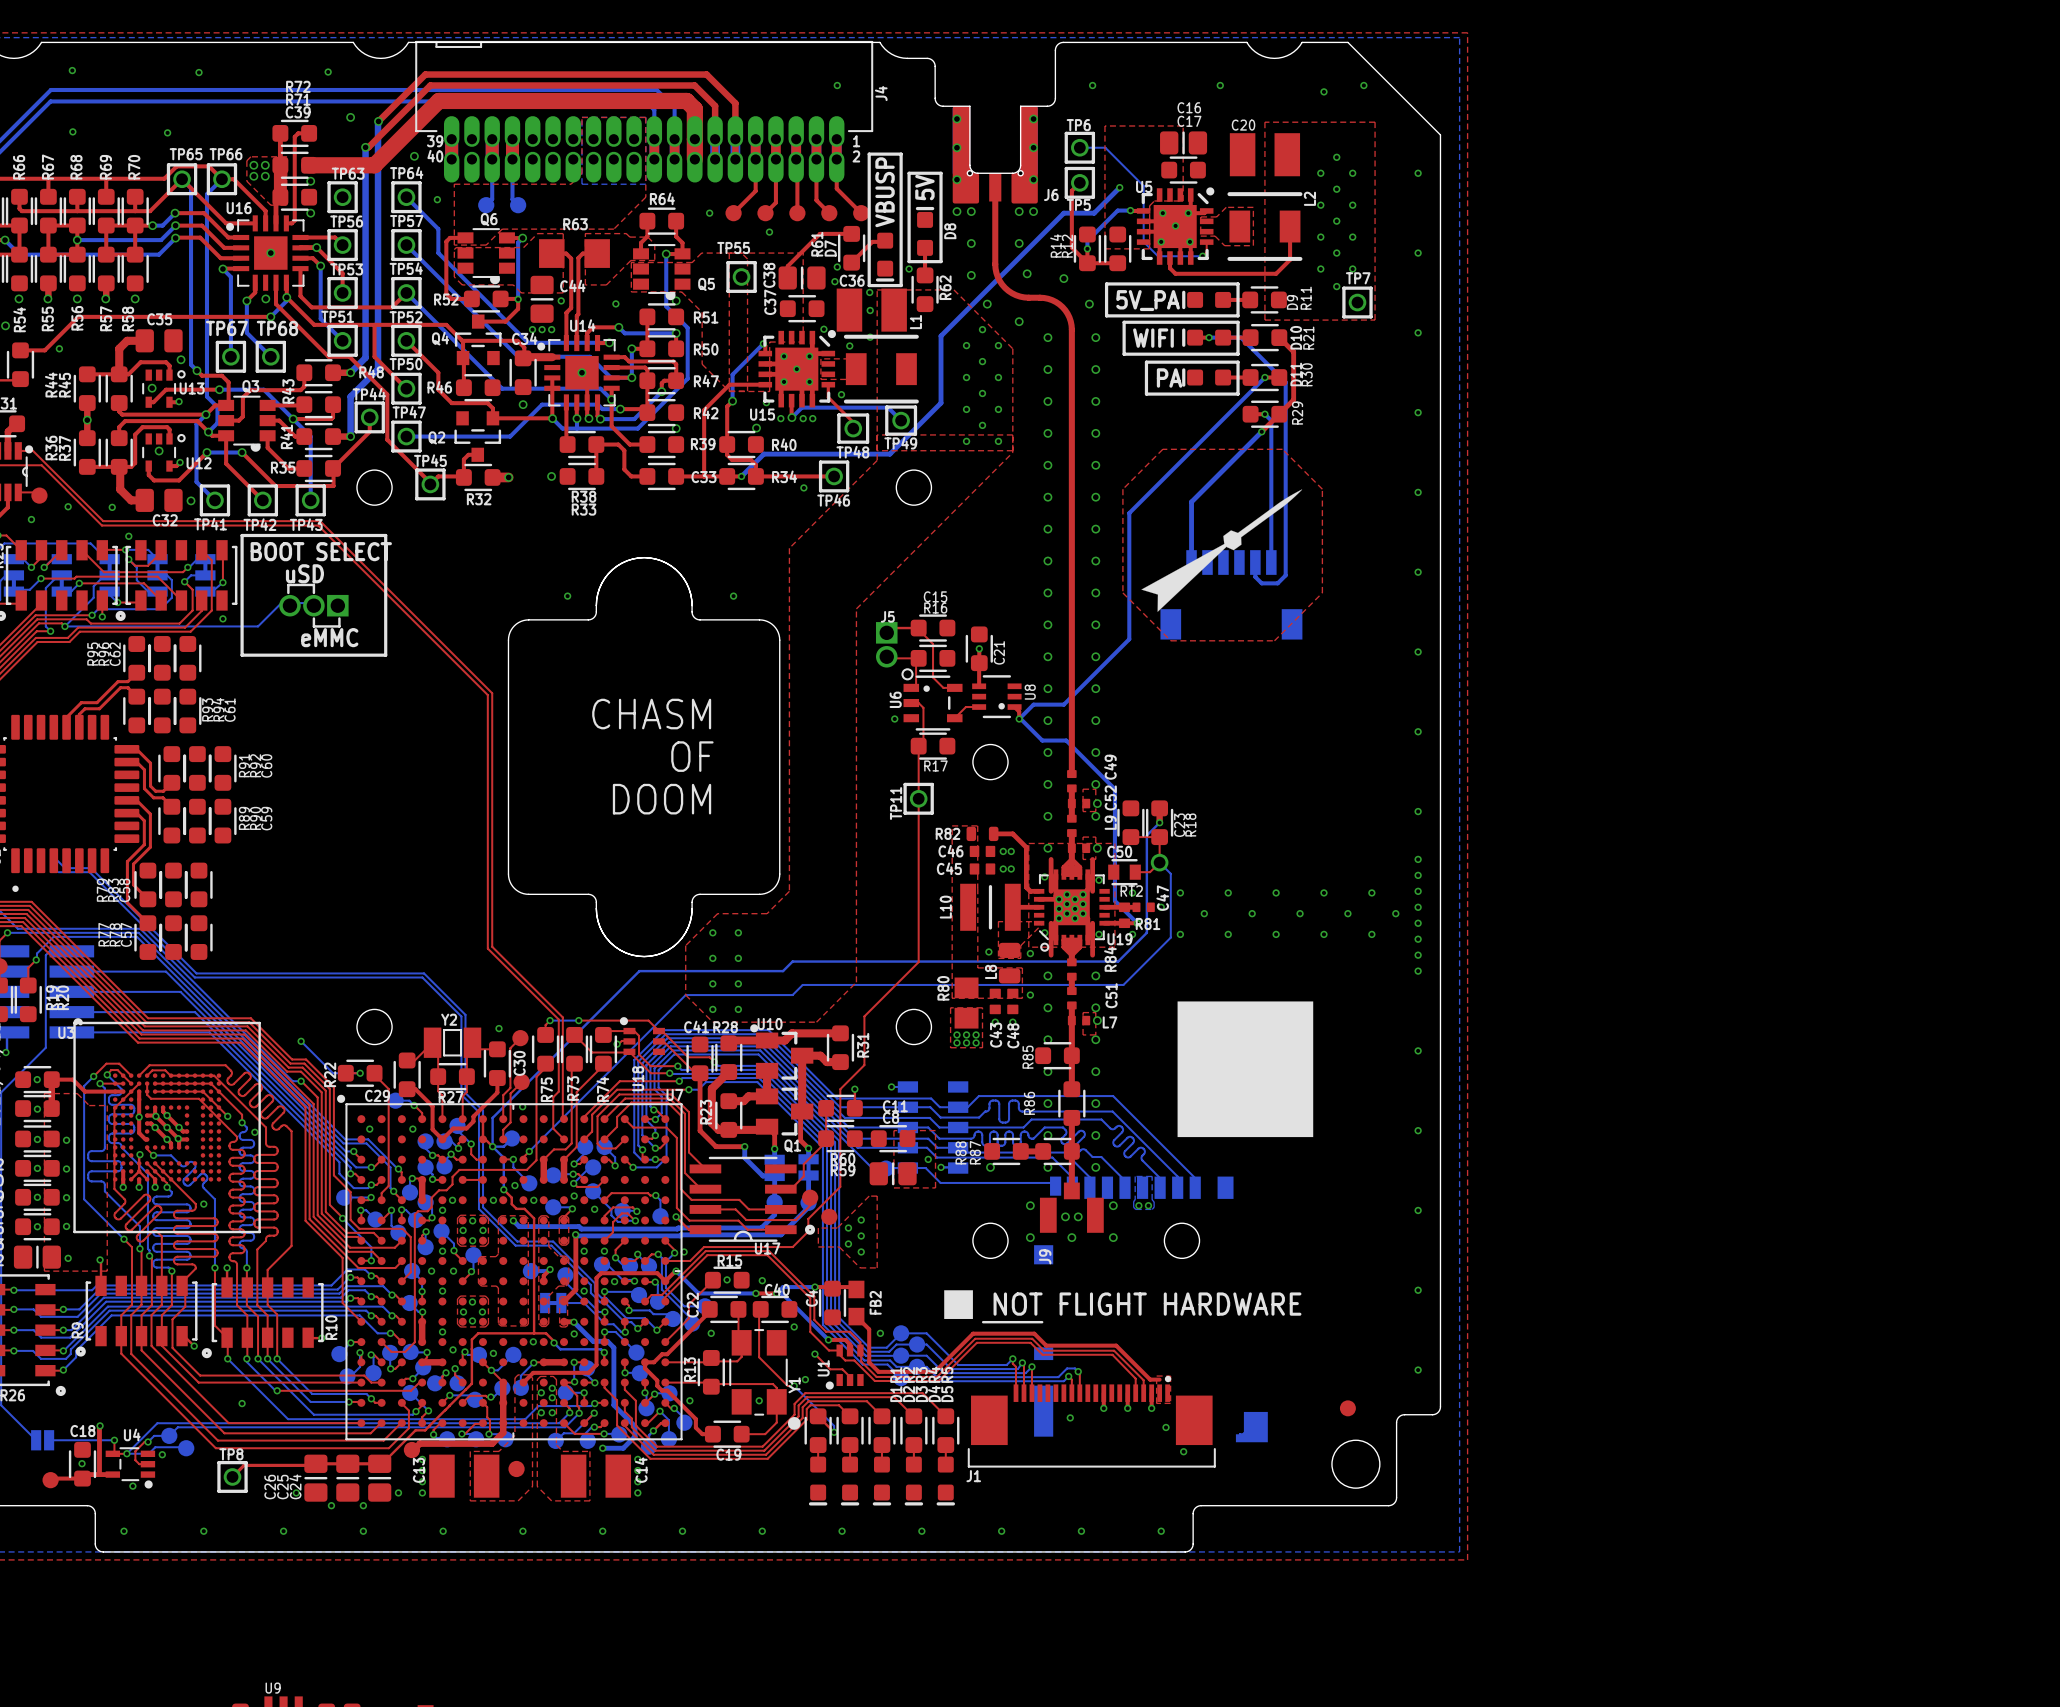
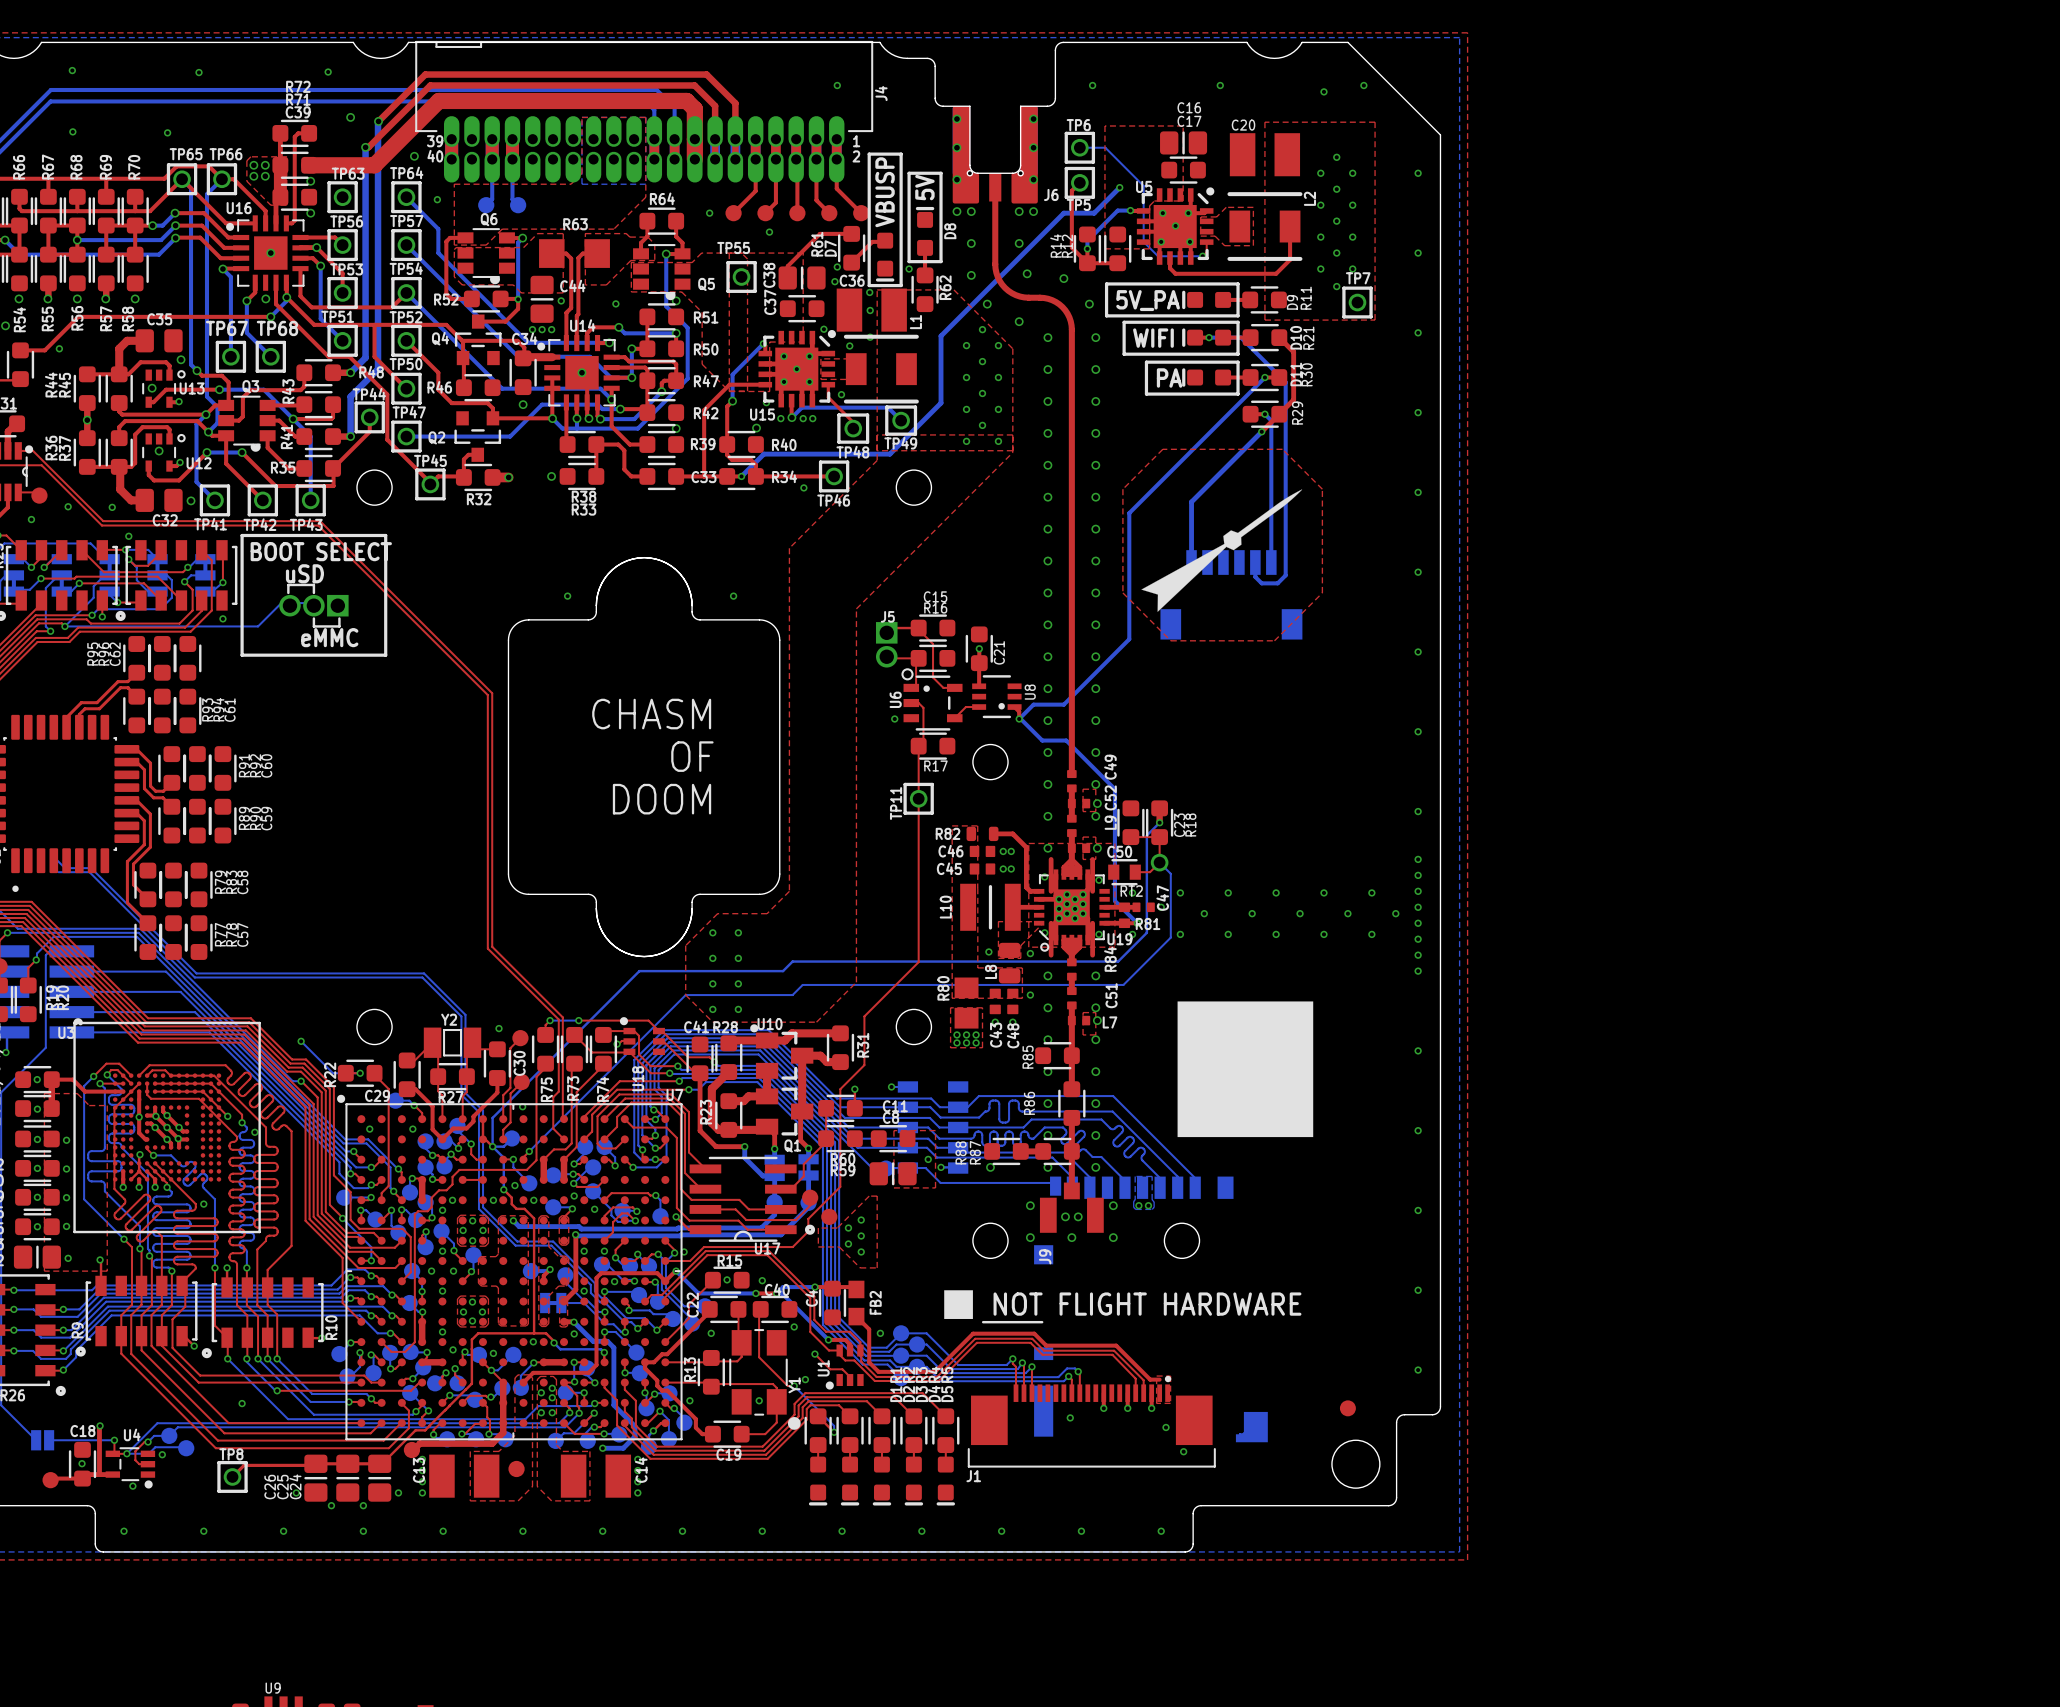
R79 name position: R79 (102, 890) -> R79 (220, 882)
R83 name position: R83 (113, 890) -> R83 (231, 882)
C58 name position: C58 (124, 890) -> C58 (242, 882)
R77 name position: R77 (103, 934) -> R77 (220, 934)
R78 name position: R78 (115, 934) -> R78 (231, 934)
C57 name position: C57 (126, 934) -> C57 (242, 934)

